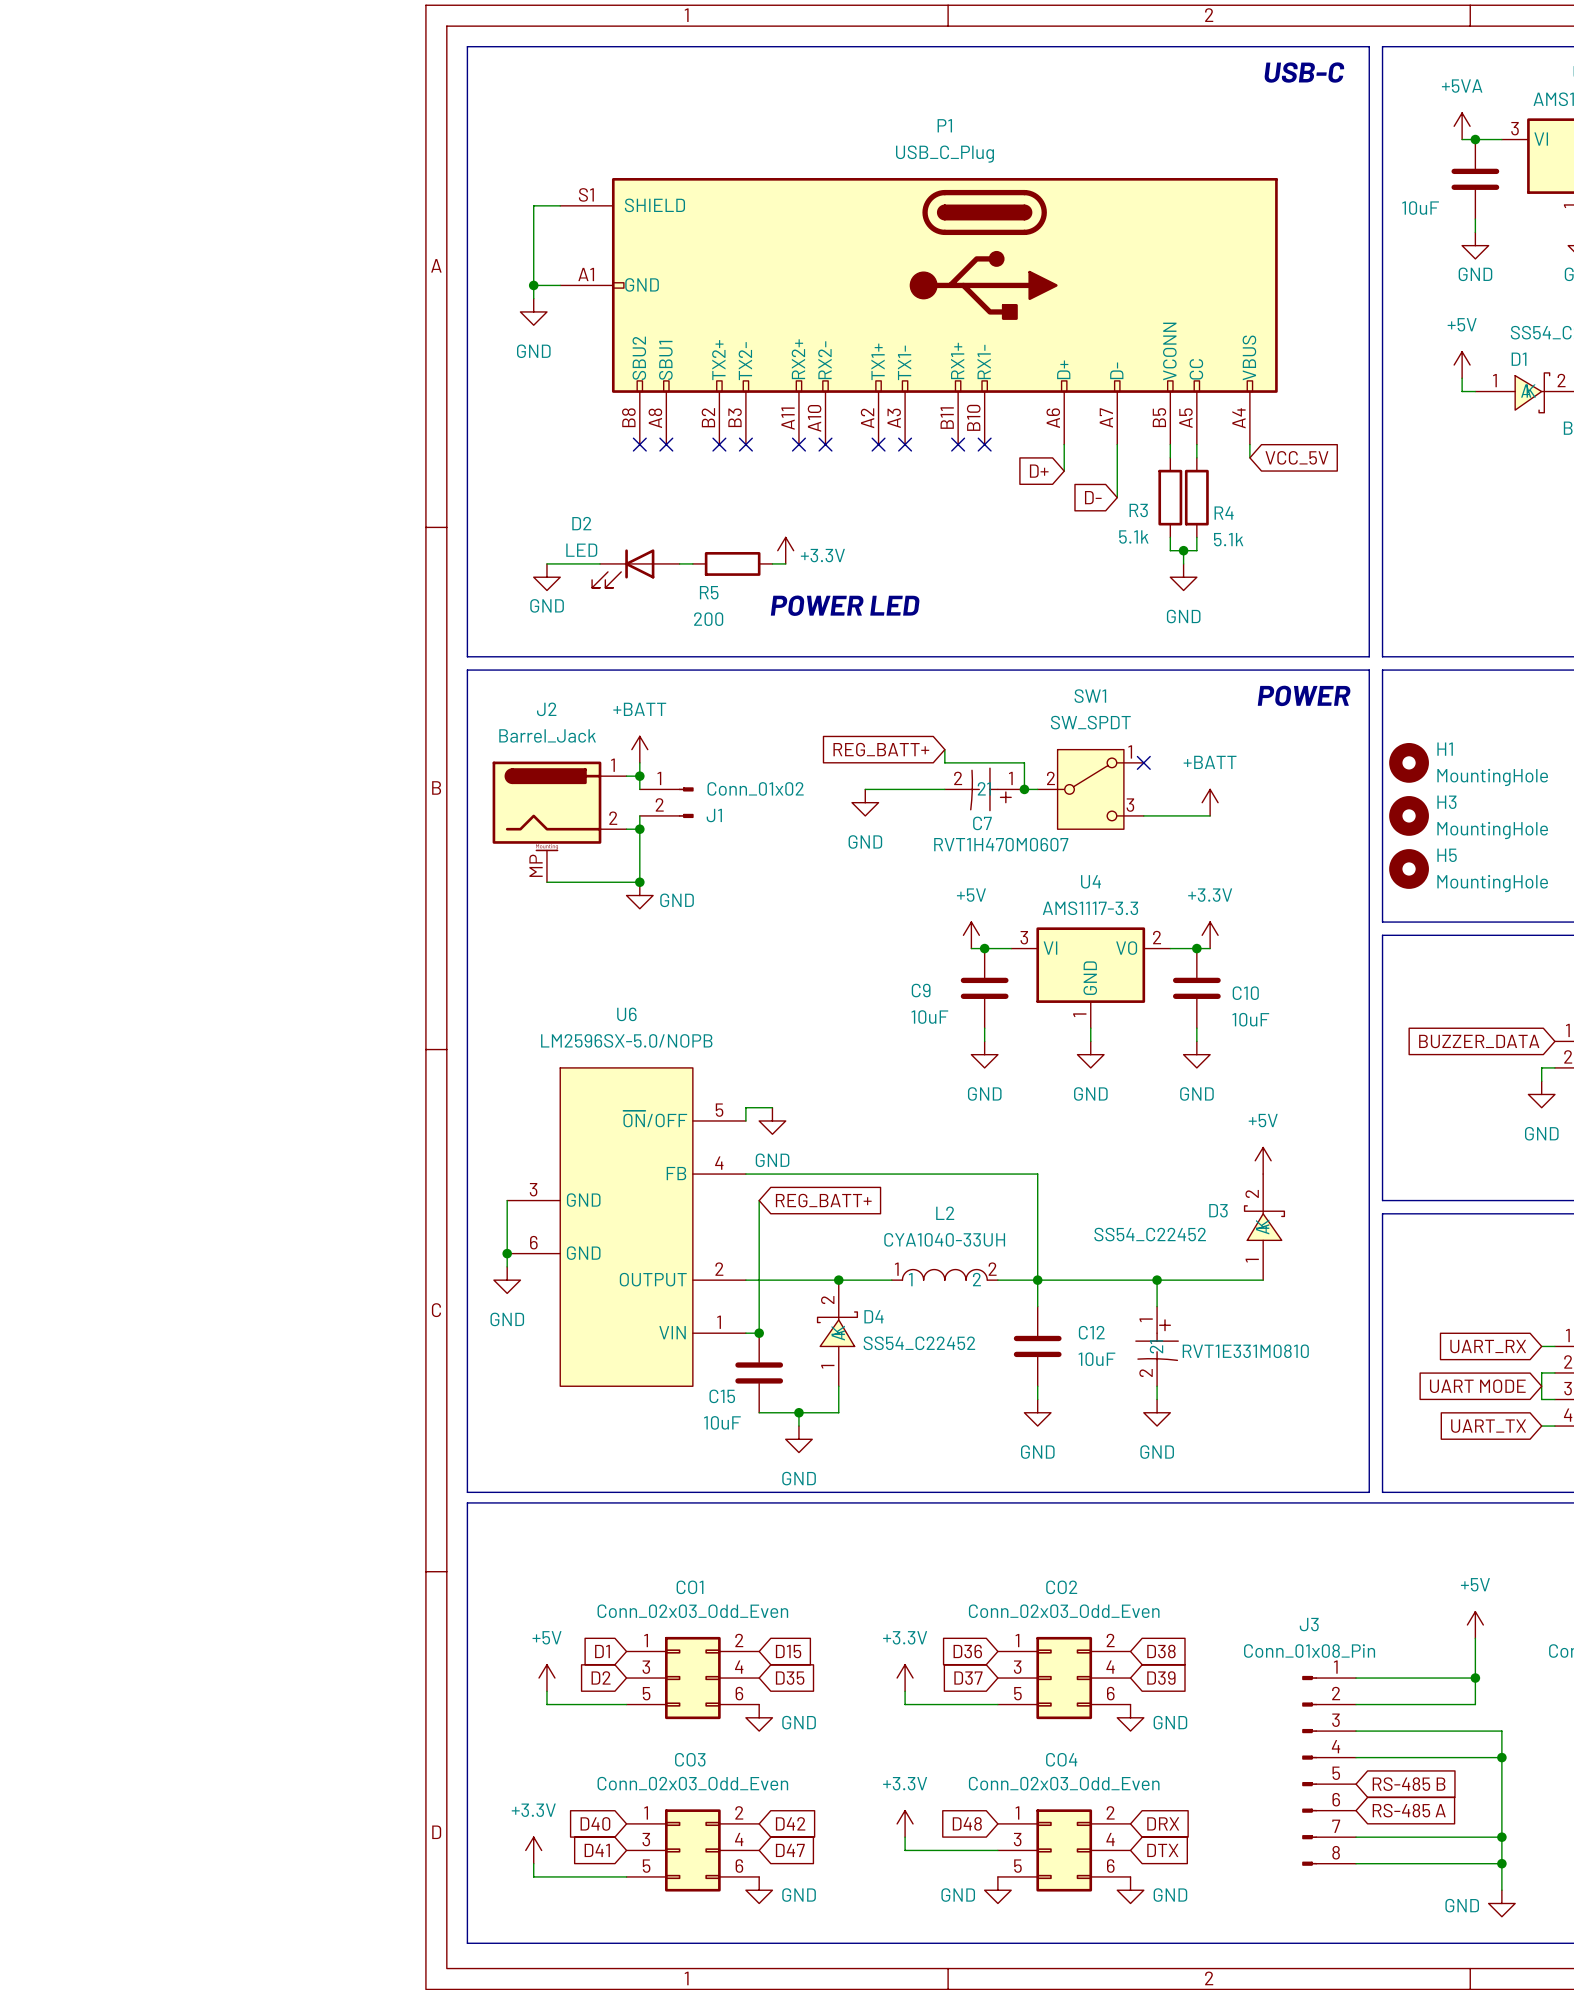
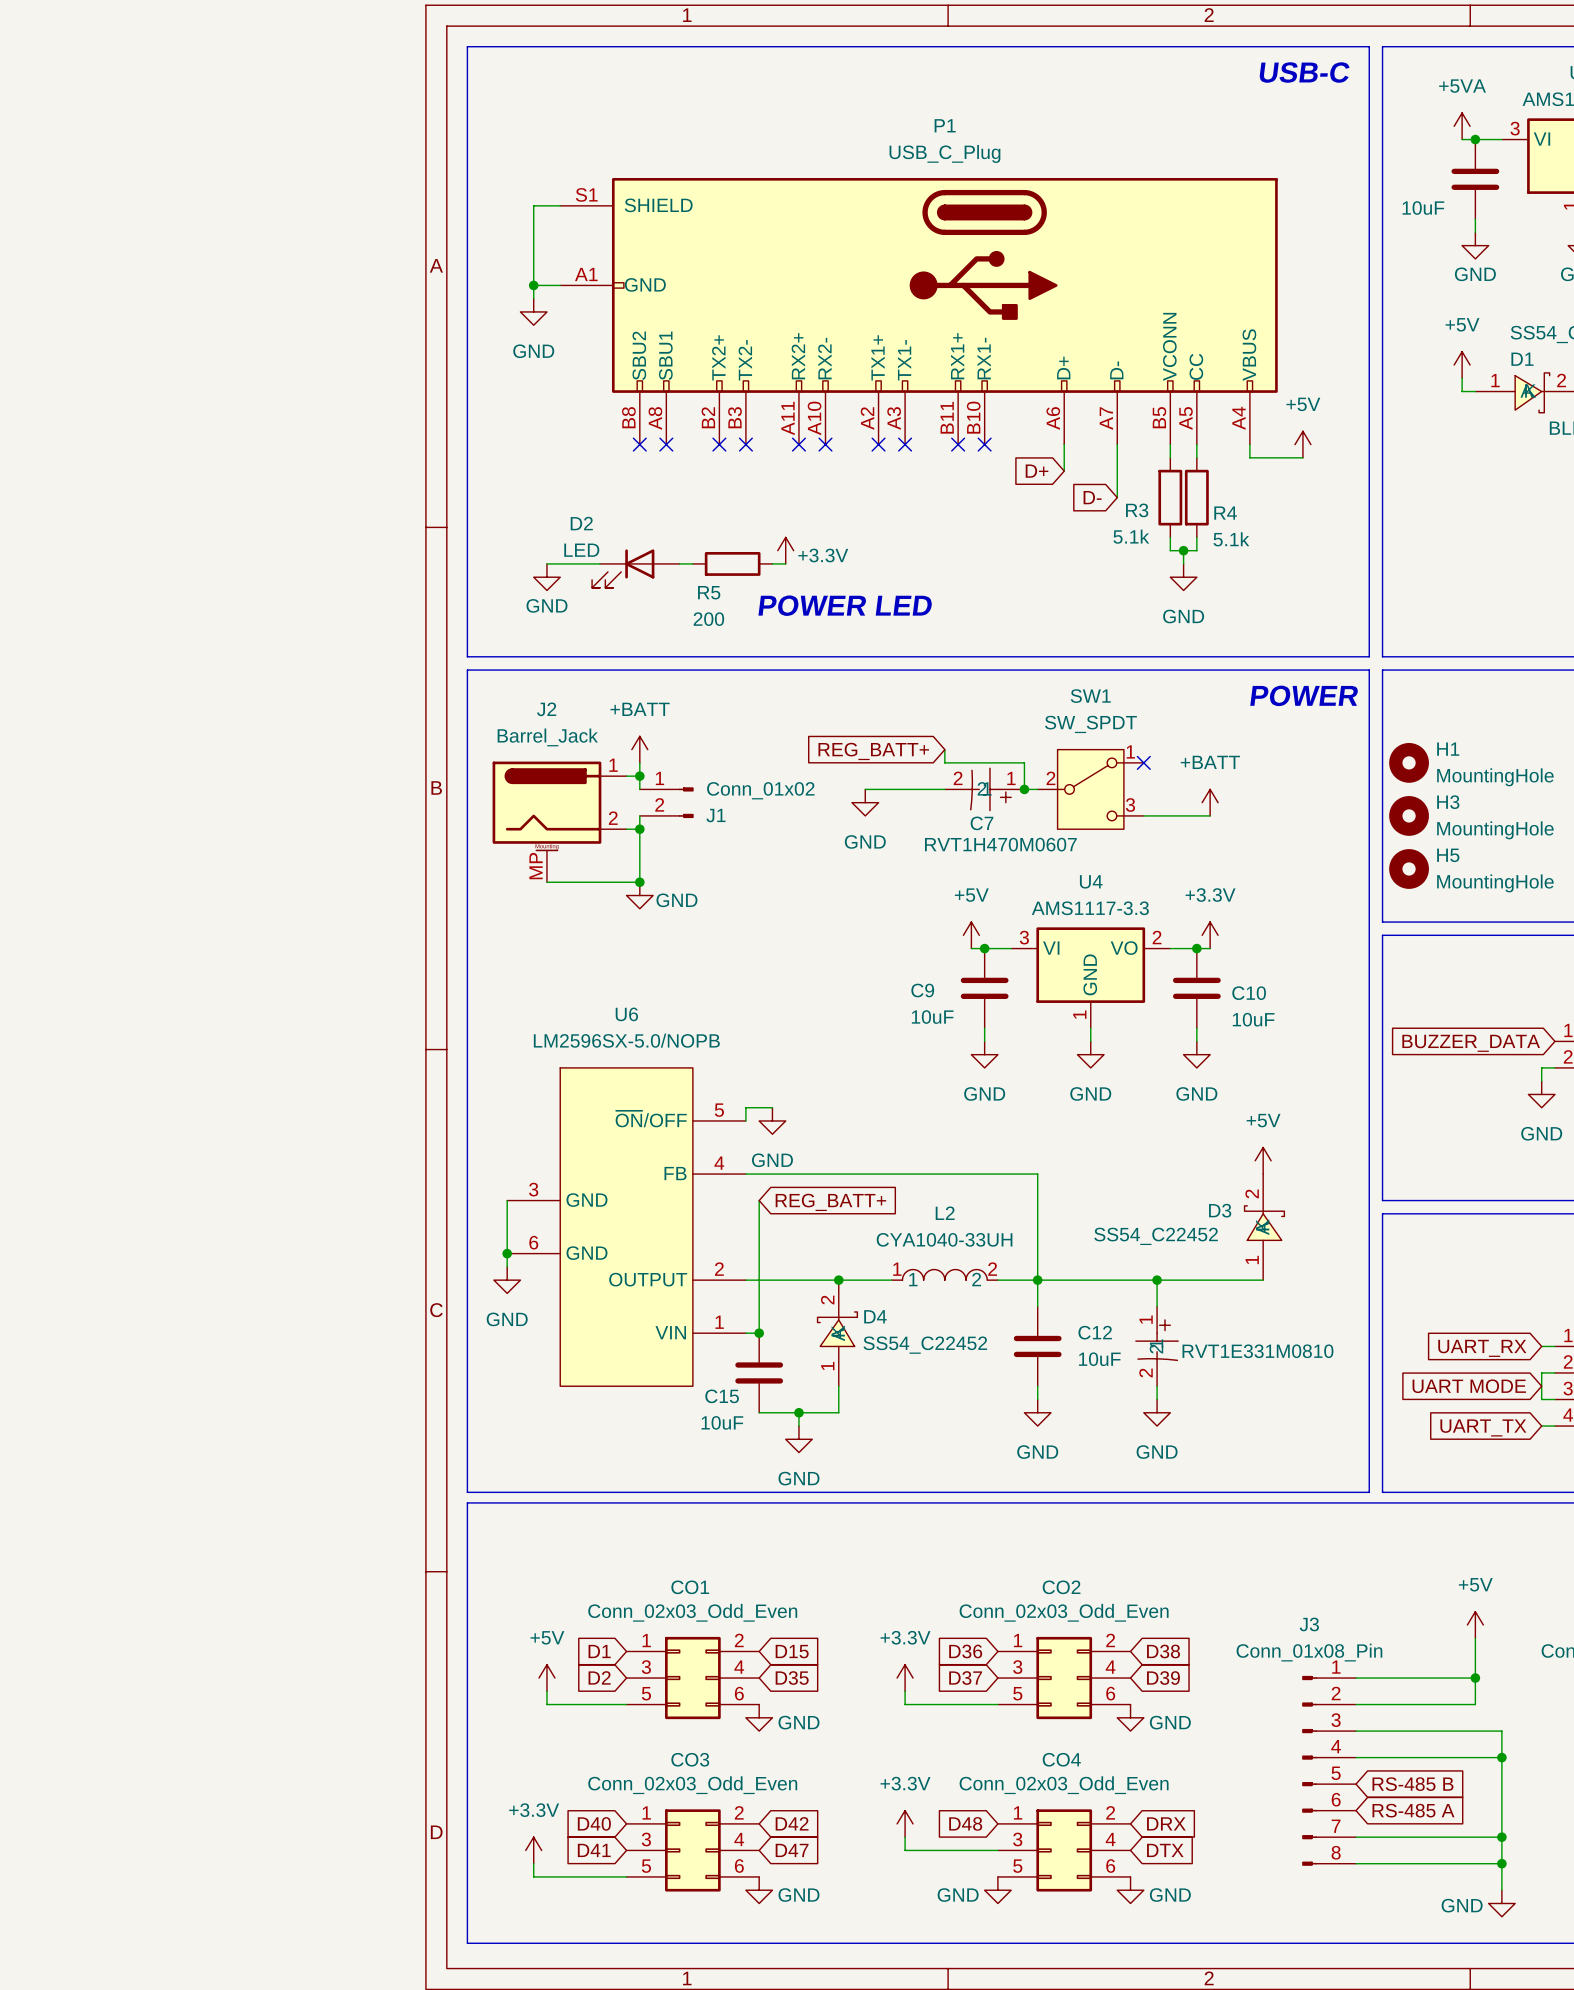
power symbol: none -> +5V (1302, 444)
wire: none -> (1249, 457) (1302, 457)
global label: VCC_5V (1296, 457) -> none

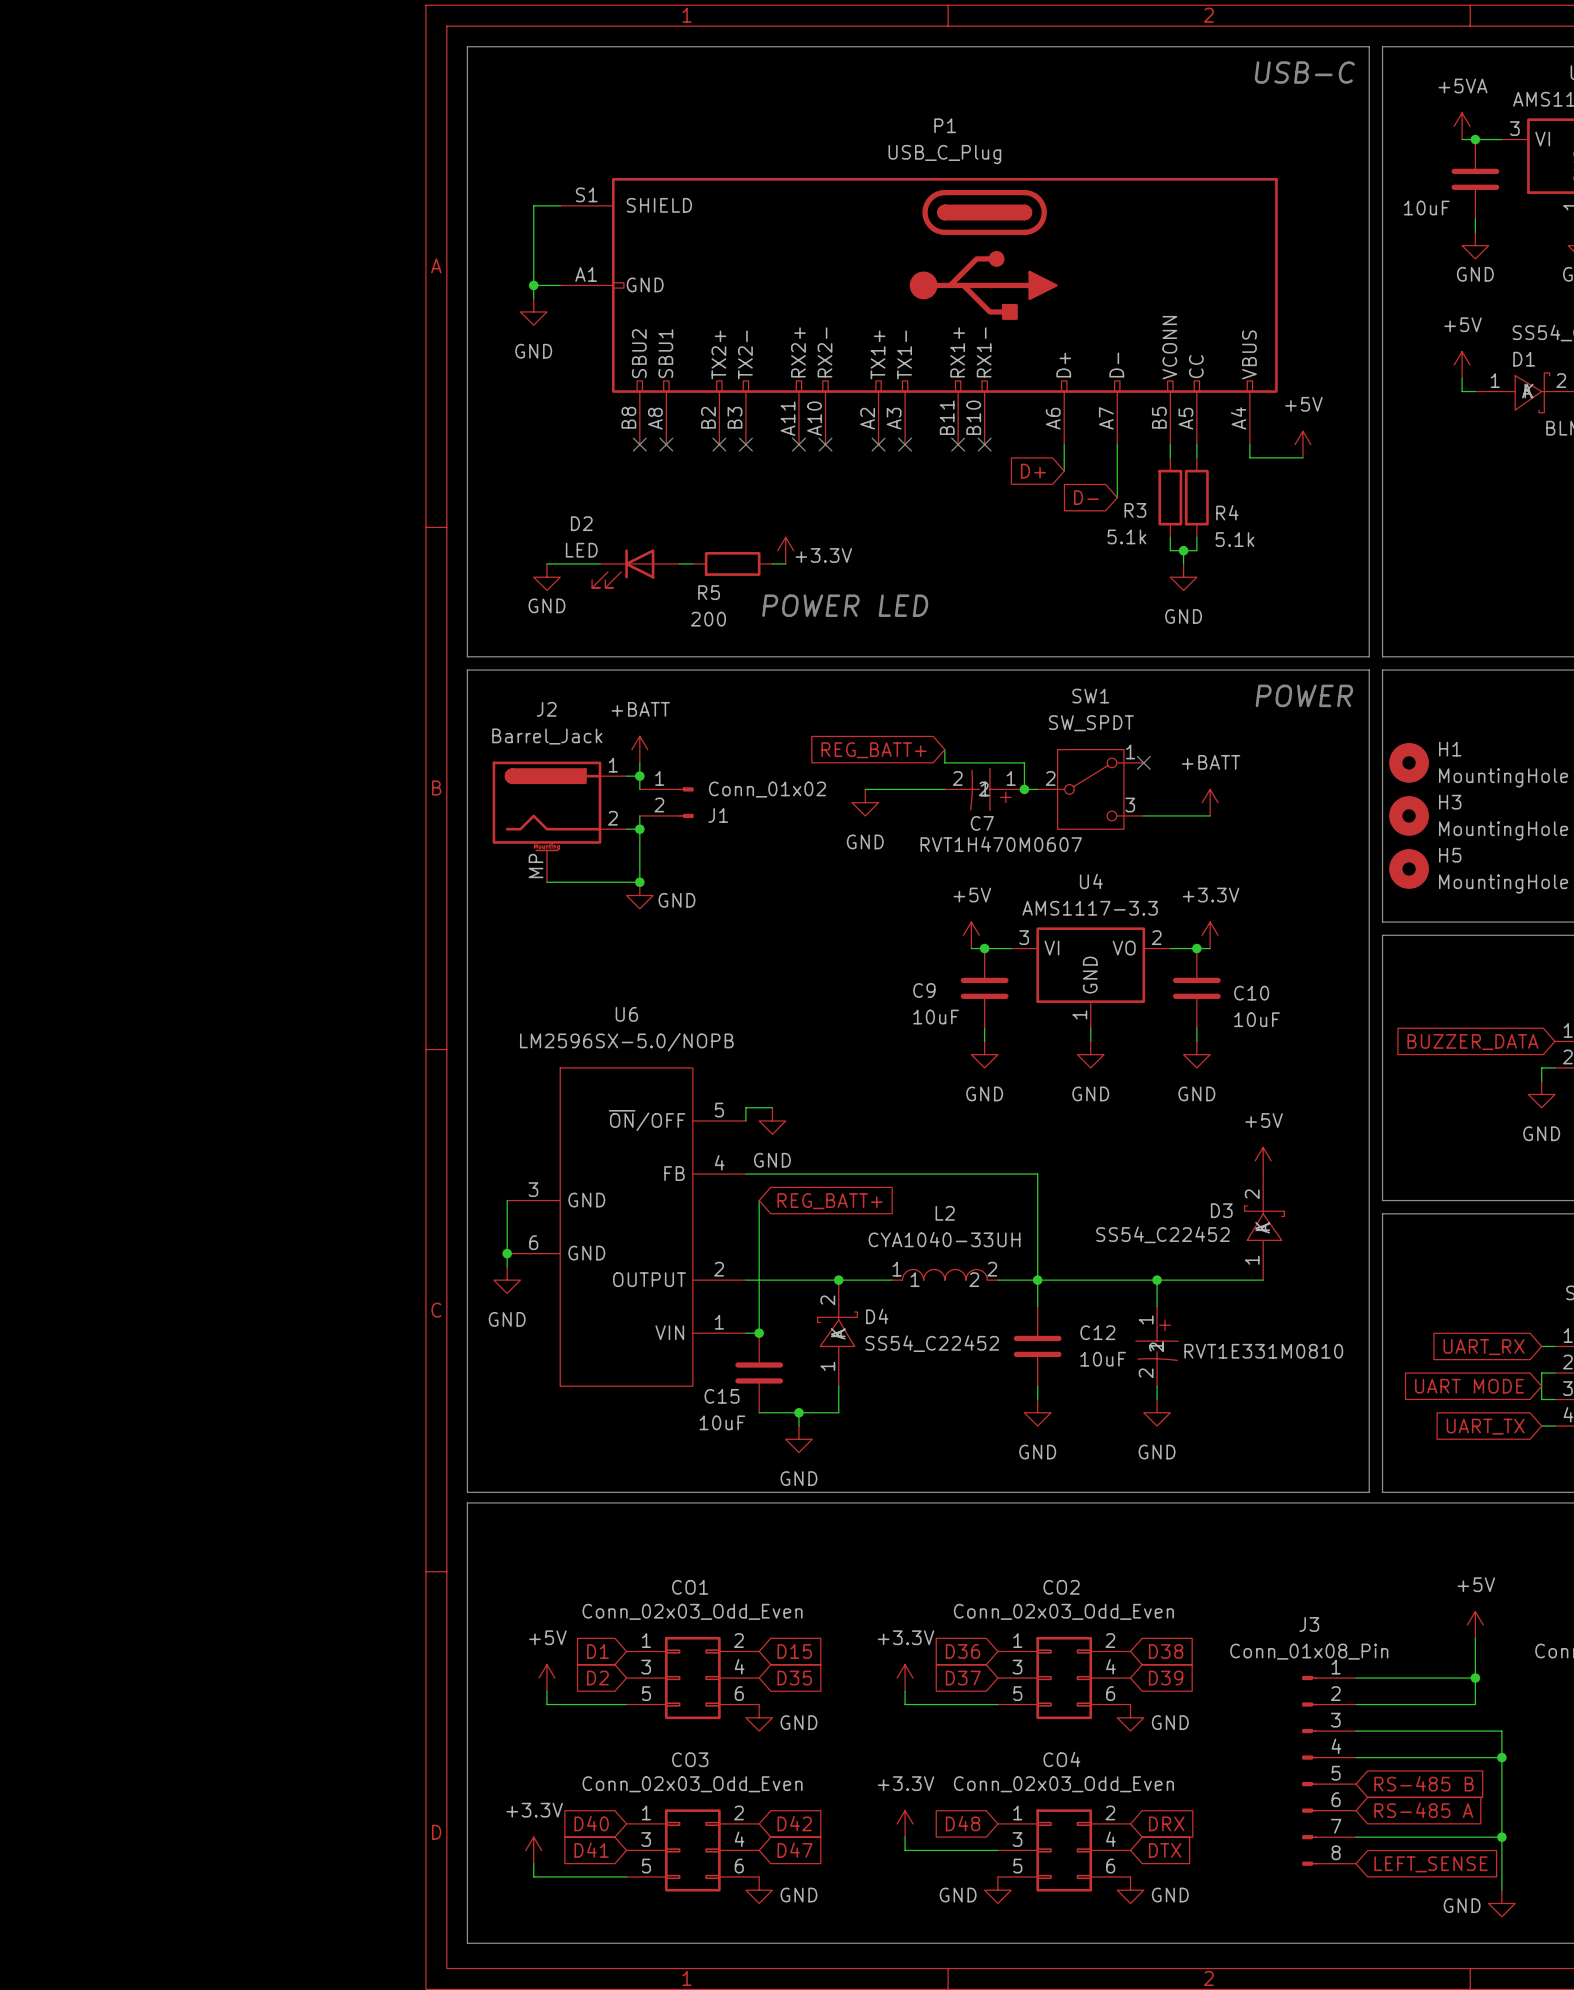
wire: (1356, 1863) (1501, 1863) -> none
junction: (1501, 1863) -> none
global label: none -> LEFT_SENSE (1431, 1864)

